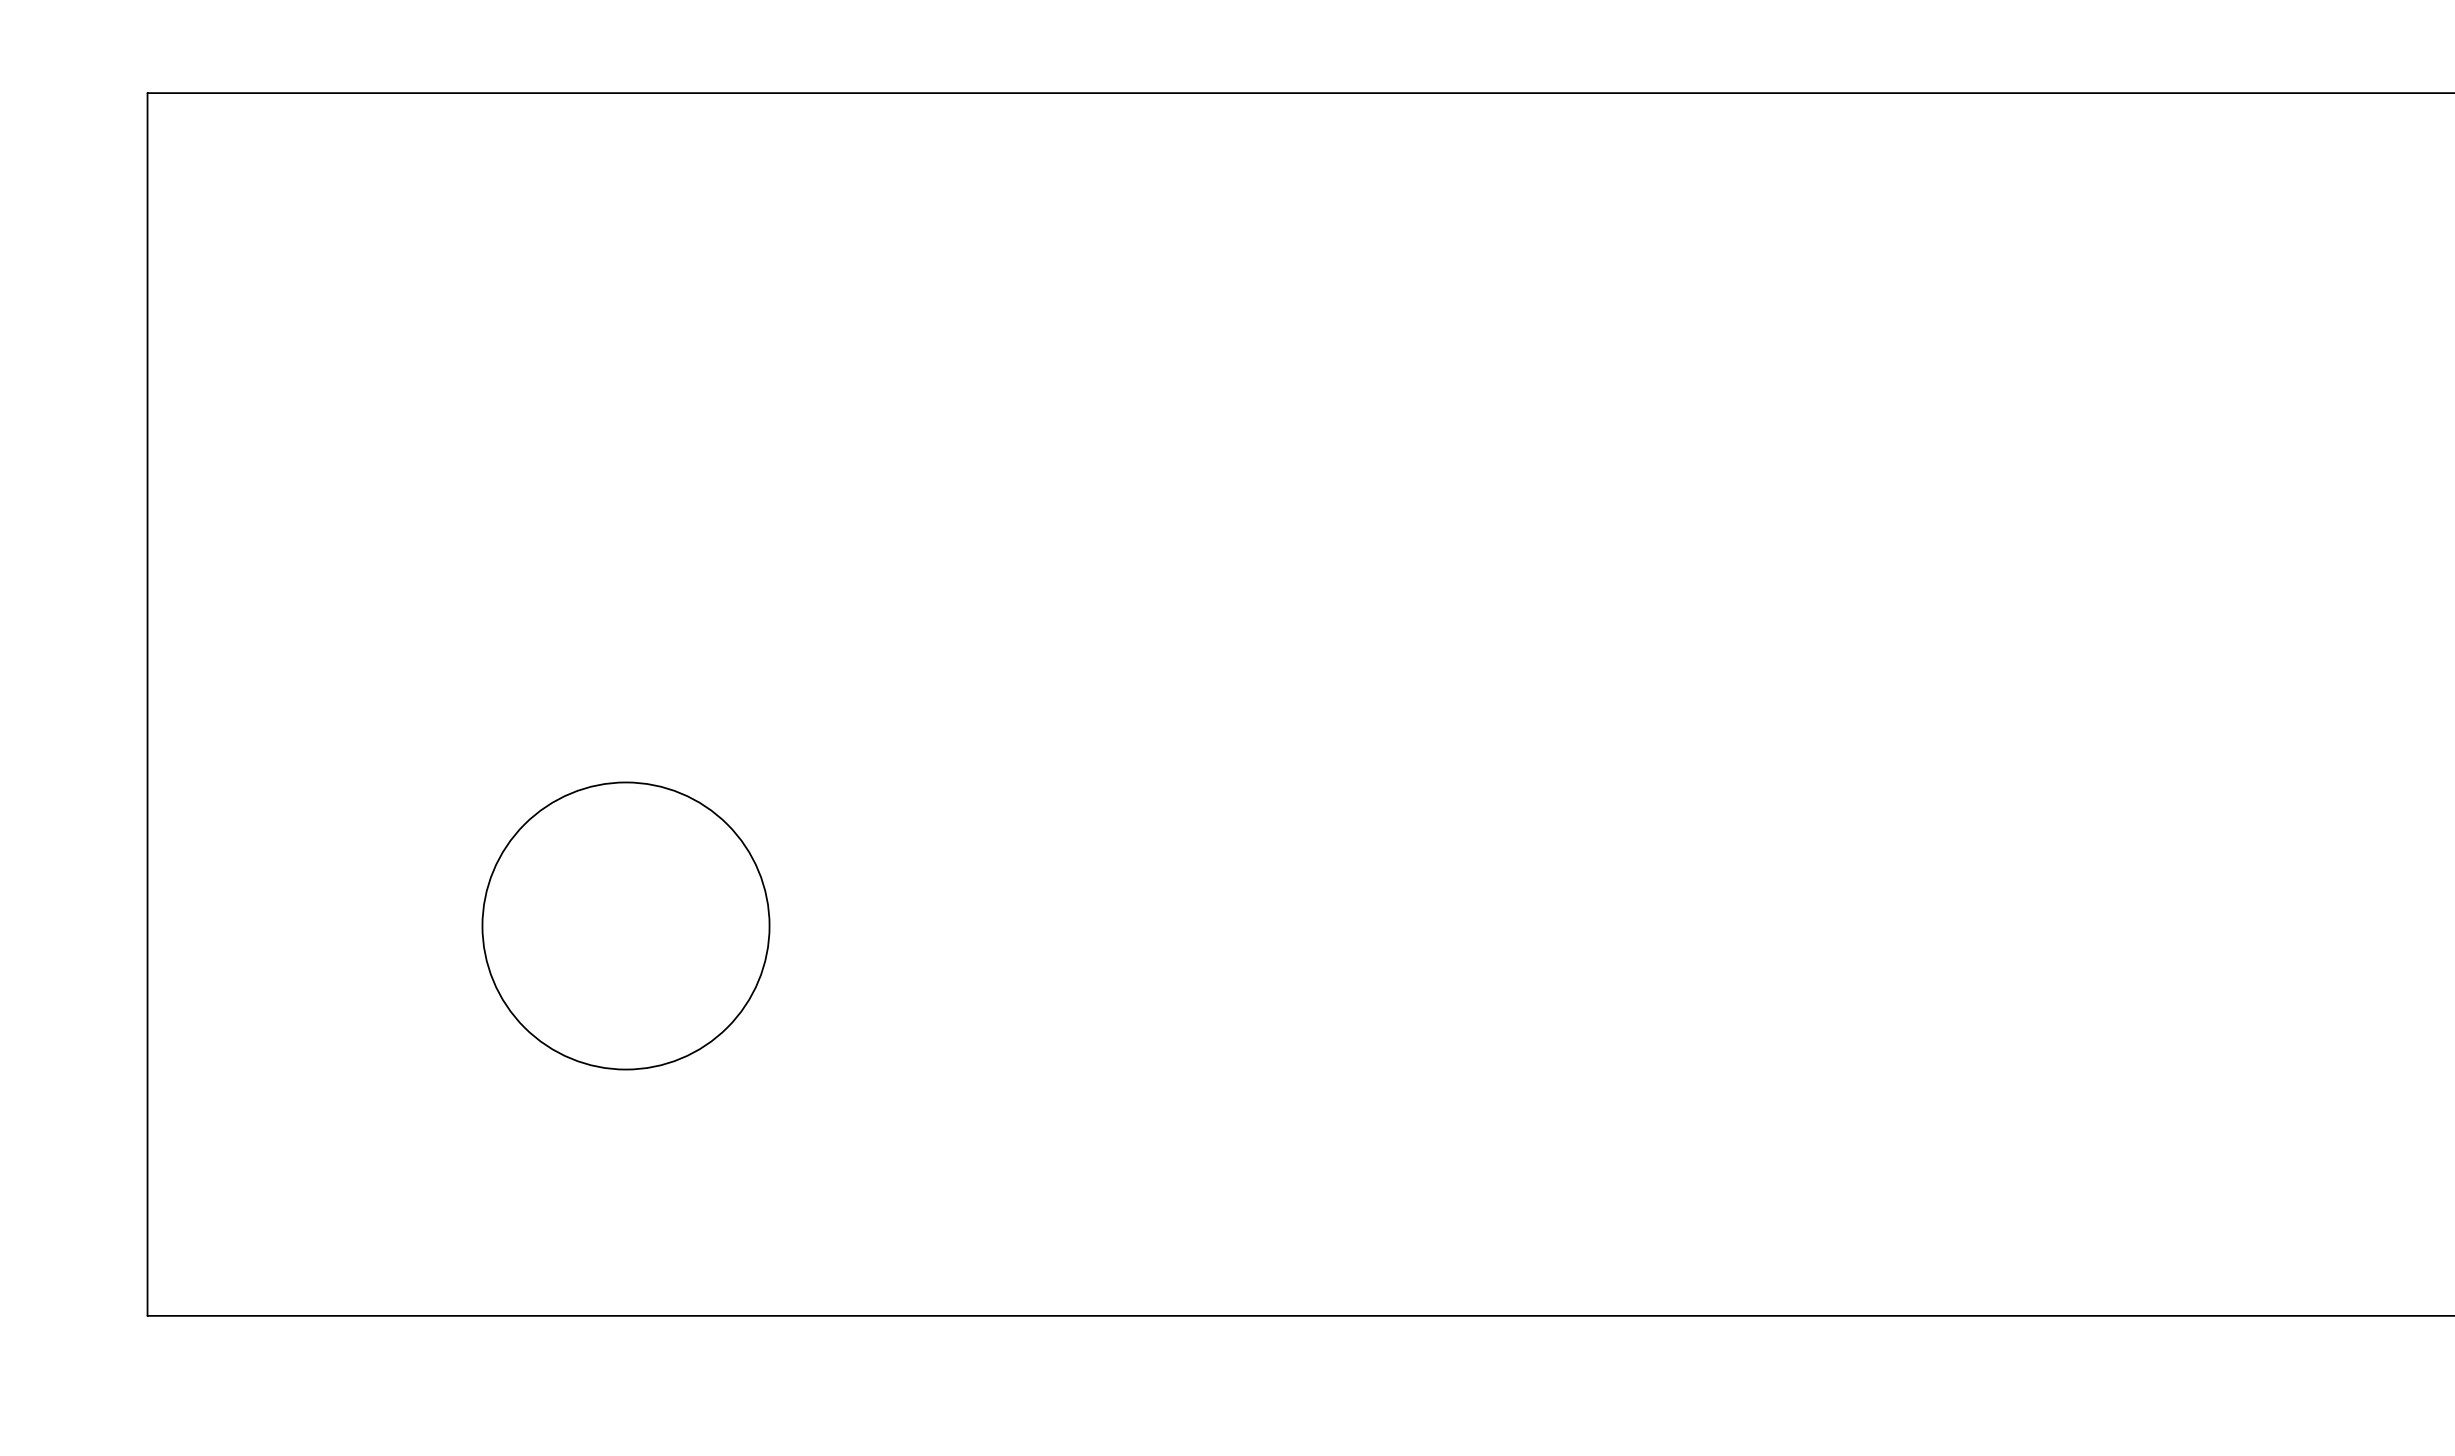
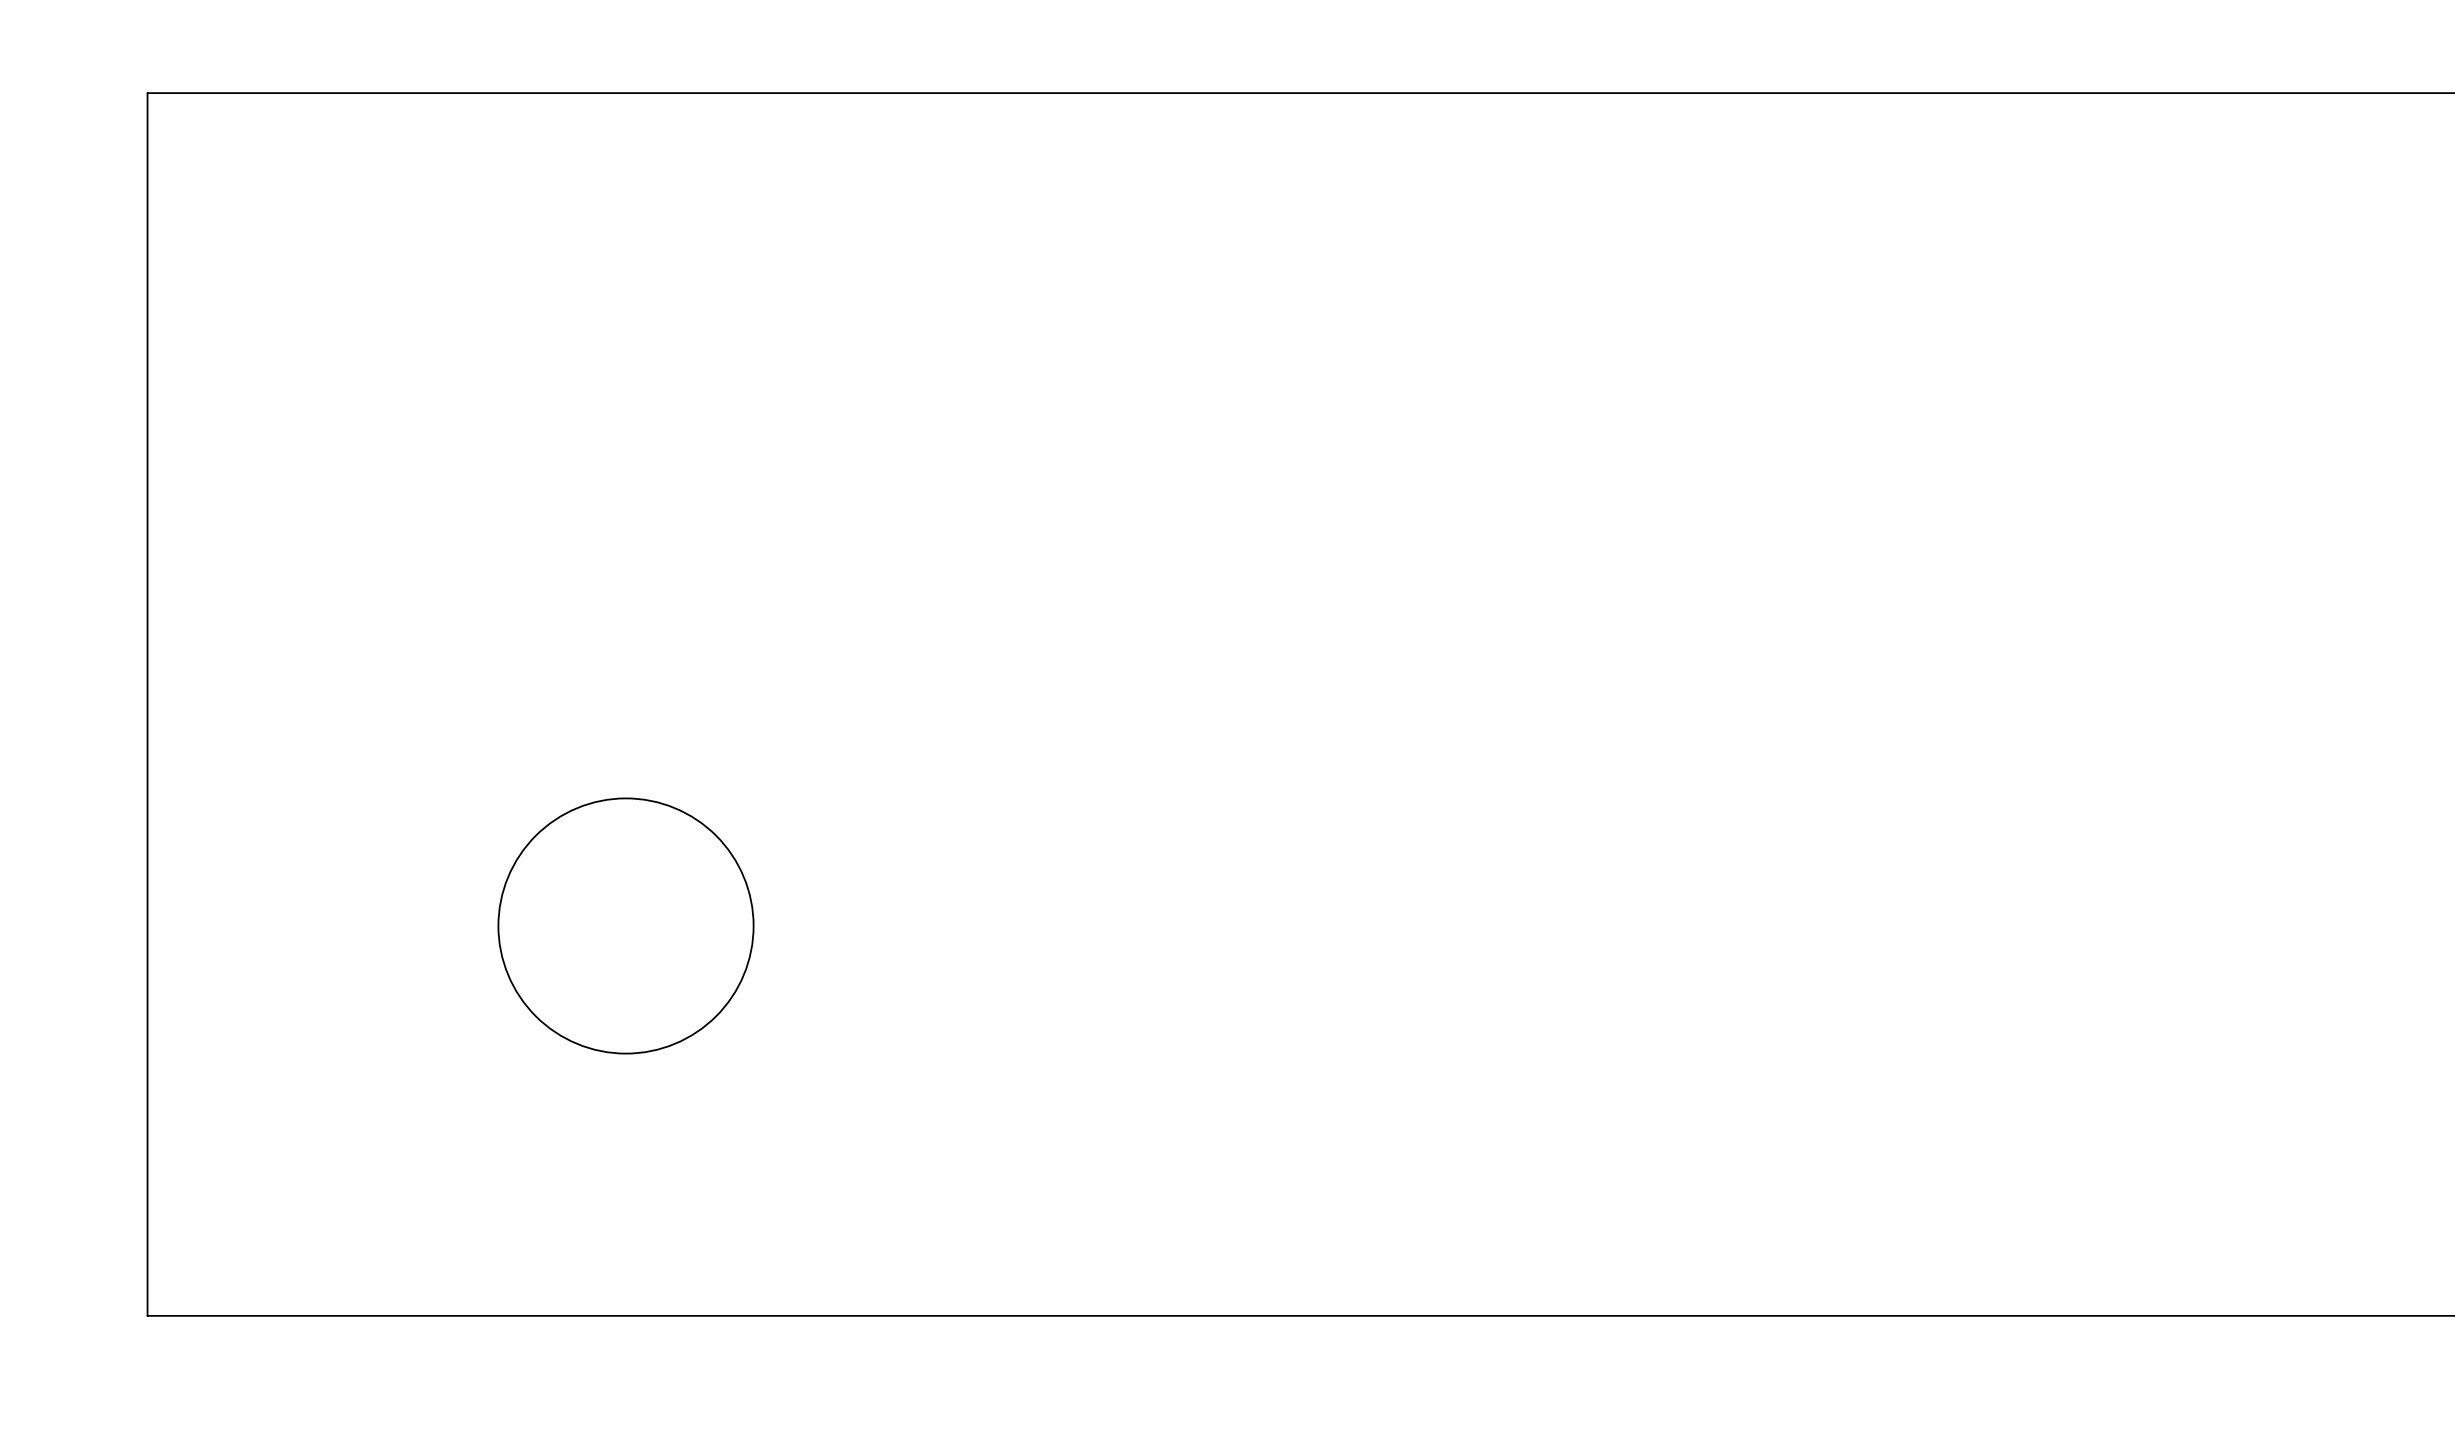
round board edge size: [481, 781, 771, 1071] -> [497, 797, 755, 1055]

